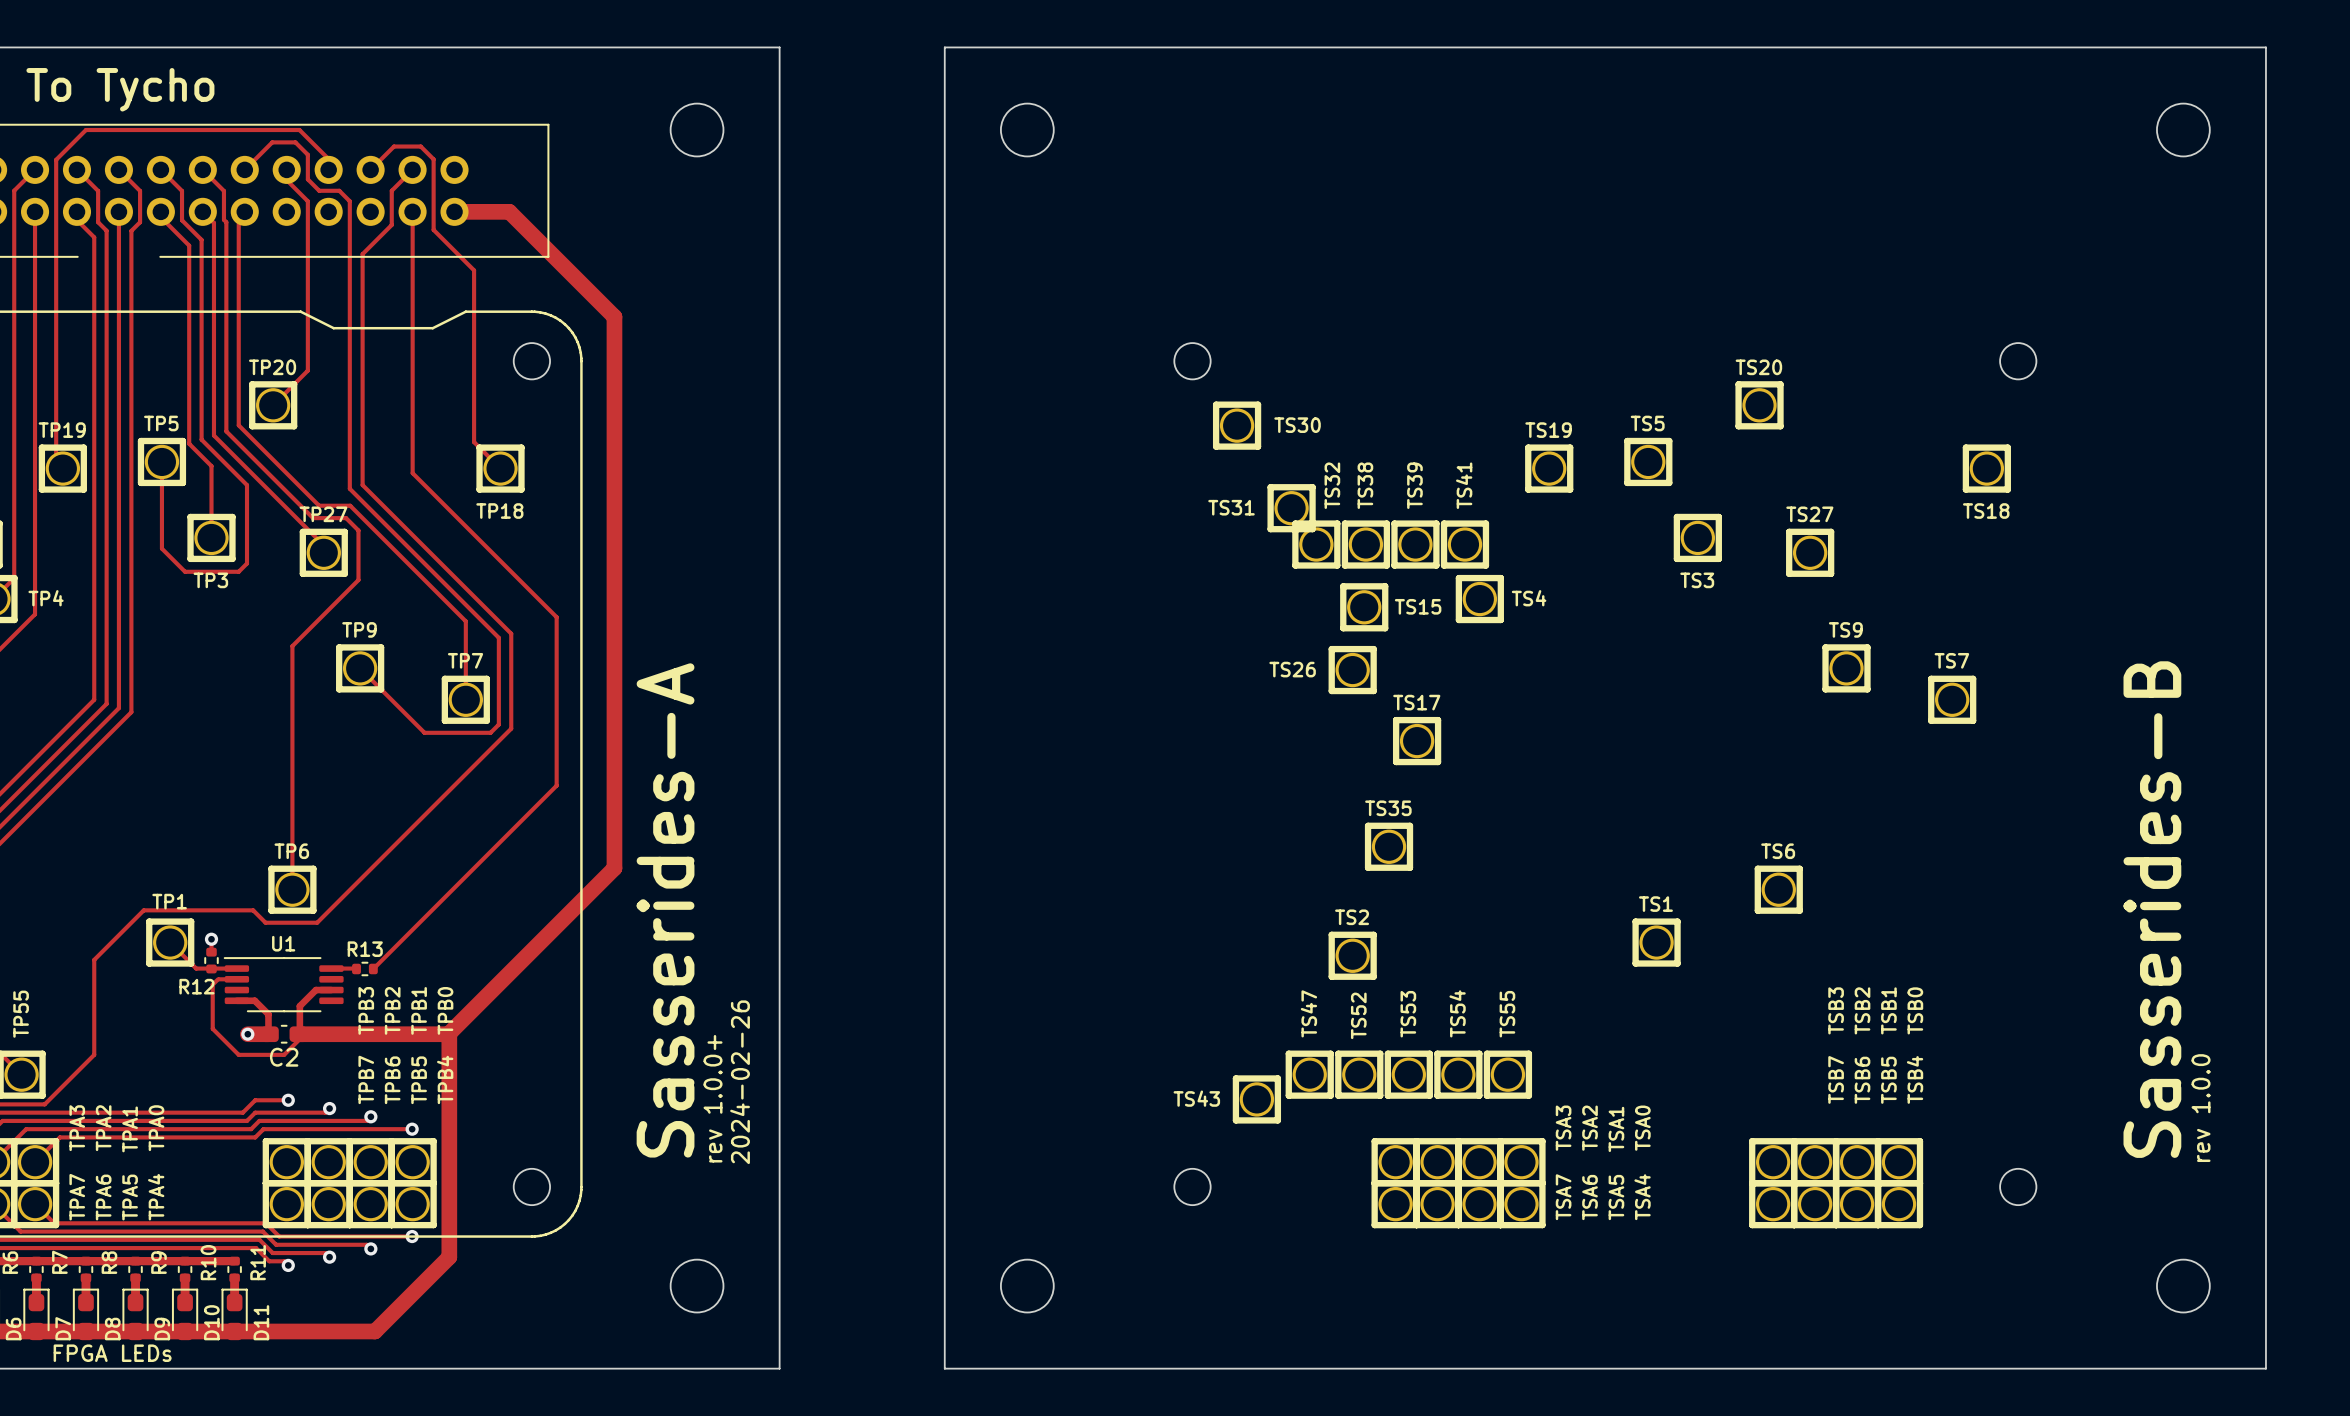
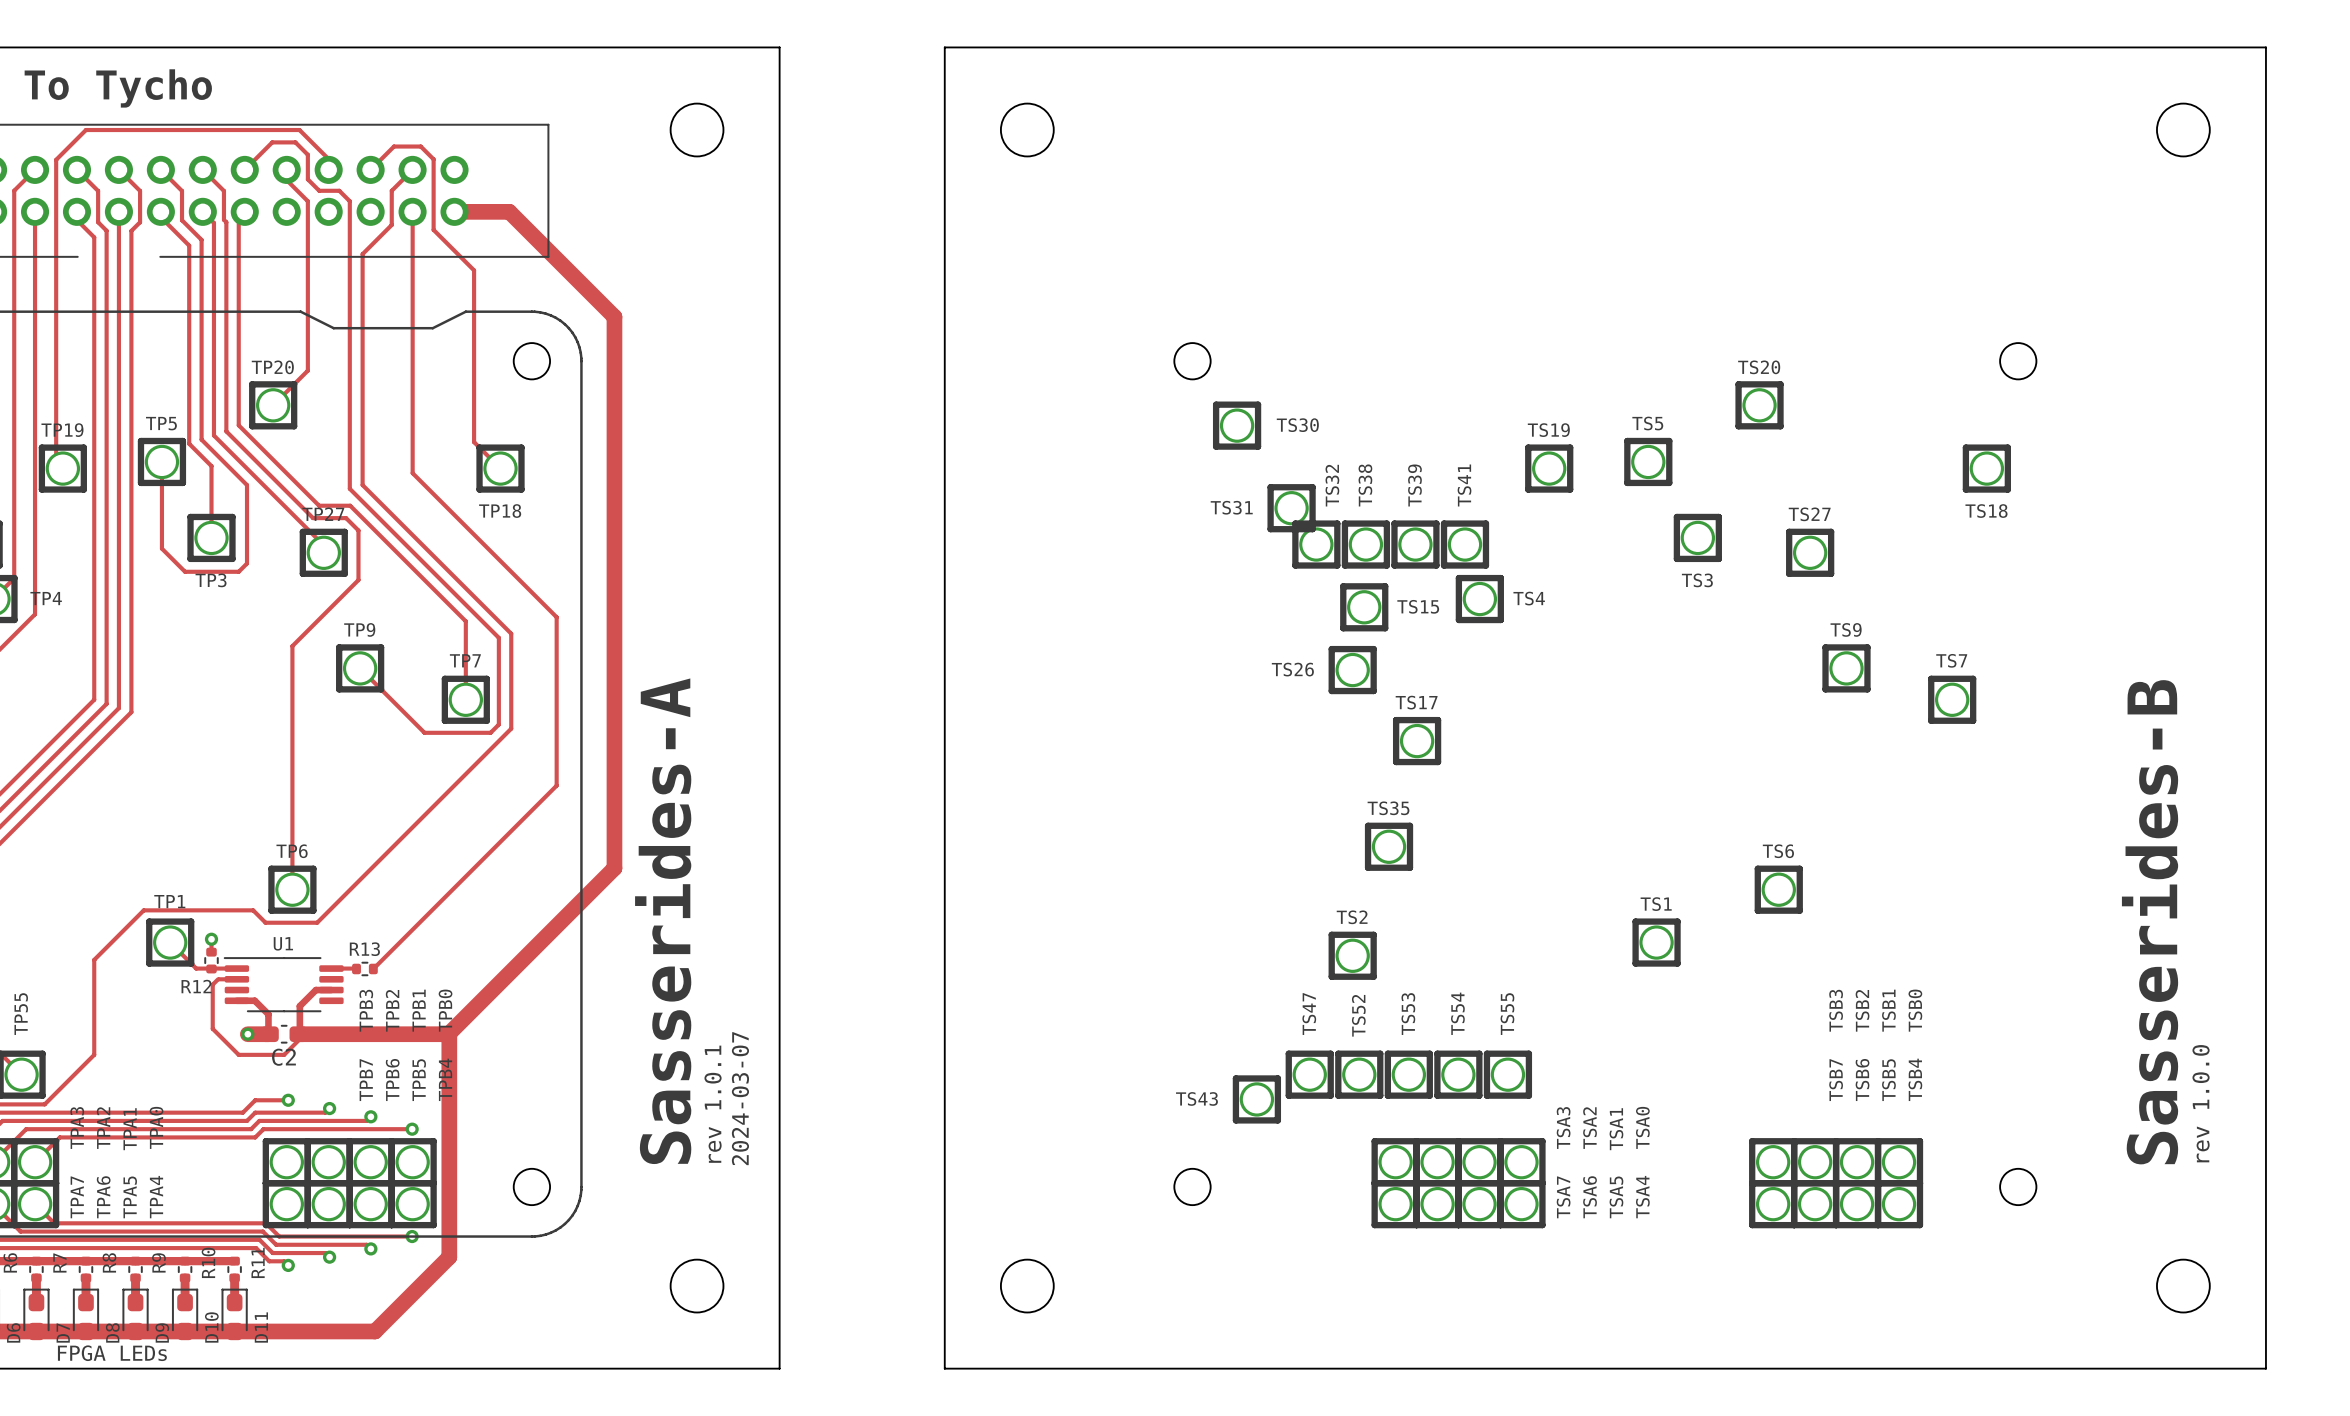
text: 2024-02-26 (740, 1082) -> 2024-03-07 (740, 1098)
text: rev 1.0.0+ (713, 1098) -> rev 1.0.1 (713, 1104)

